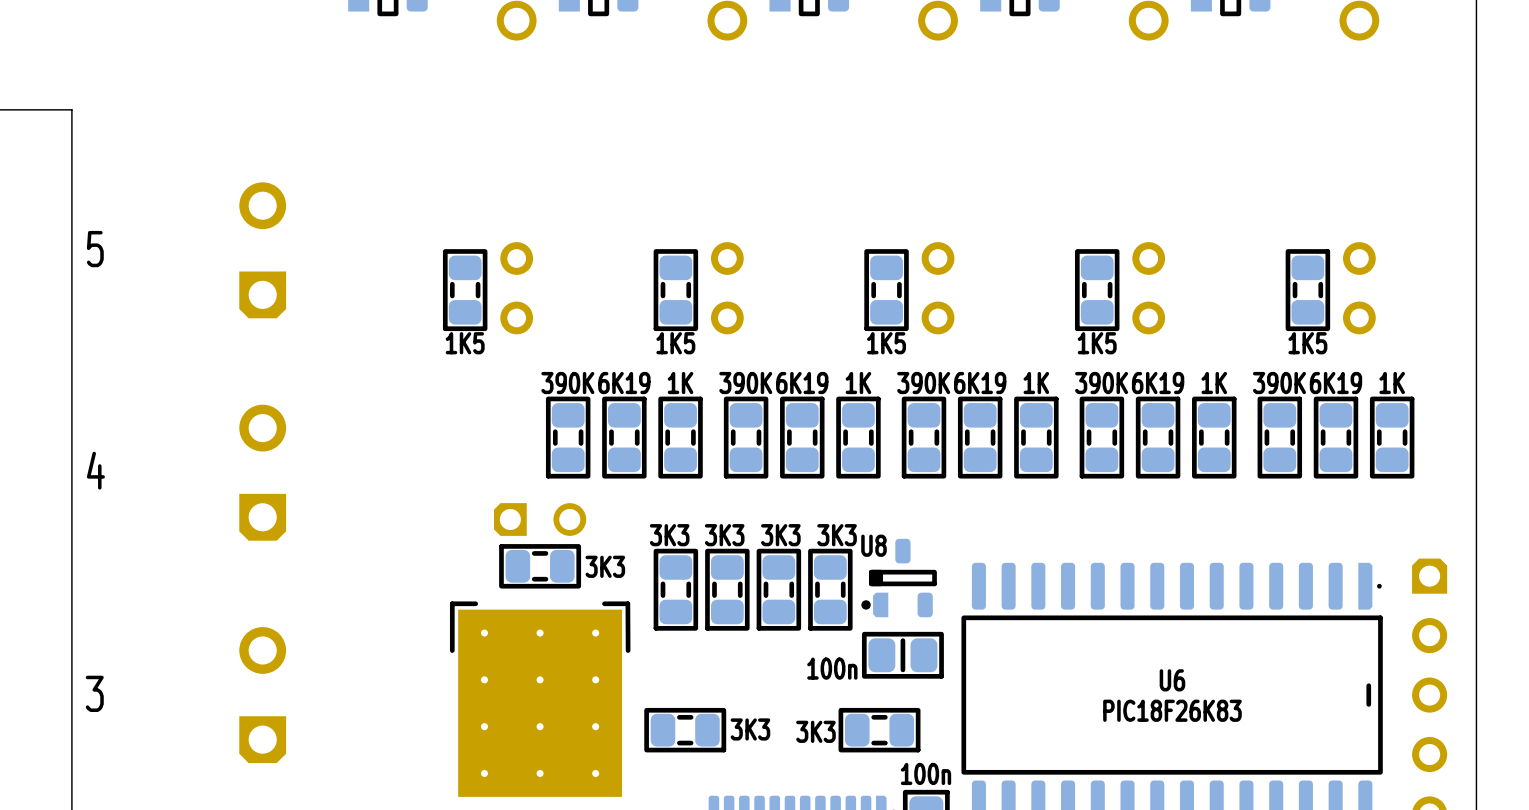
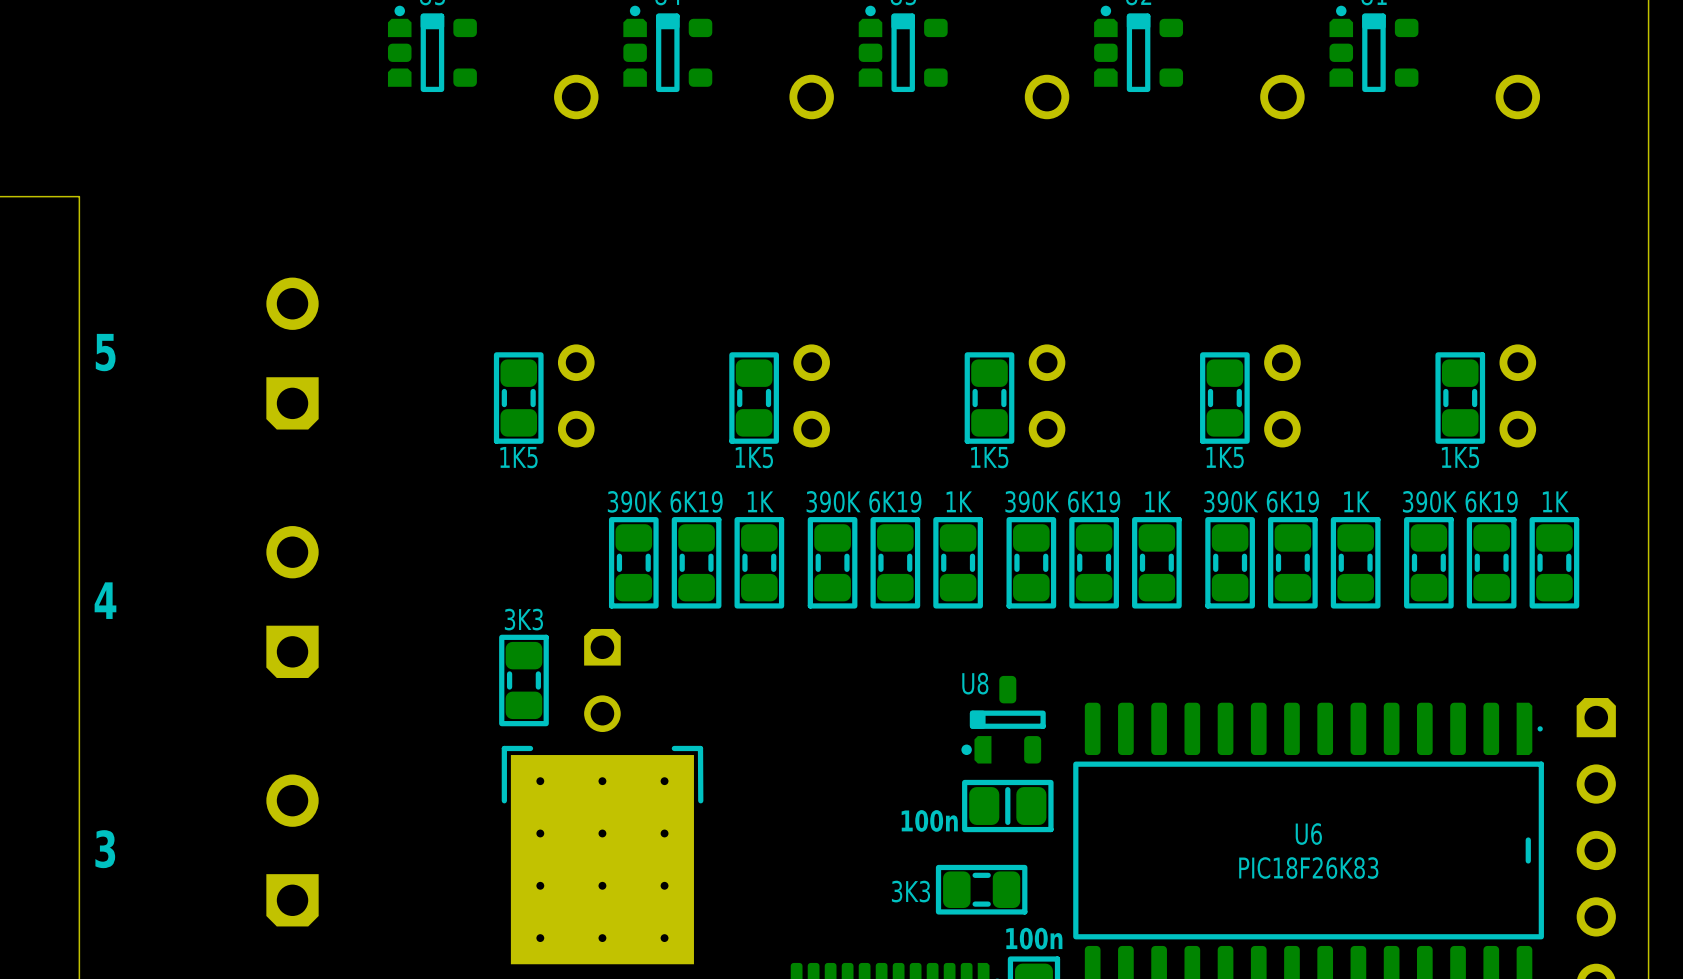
part rotation: 0° (540, 519) -> 90° clockwise (602, 680)
part rotation: 0° (540, 566) -> 90° clockwise (523, 680)
part position: (540, 566) -> (523, 680)
part value position: 3K3 (605, 566) -> 3K3 (523, 619)
part: 3K3 (675, 589) -> none
part: 3K3 (727, 589) -> none
part: 3K3 (778, 589) -> none
part: 3K3 (830, 589) -> none
part: 3K3 (685, 730) -> none

